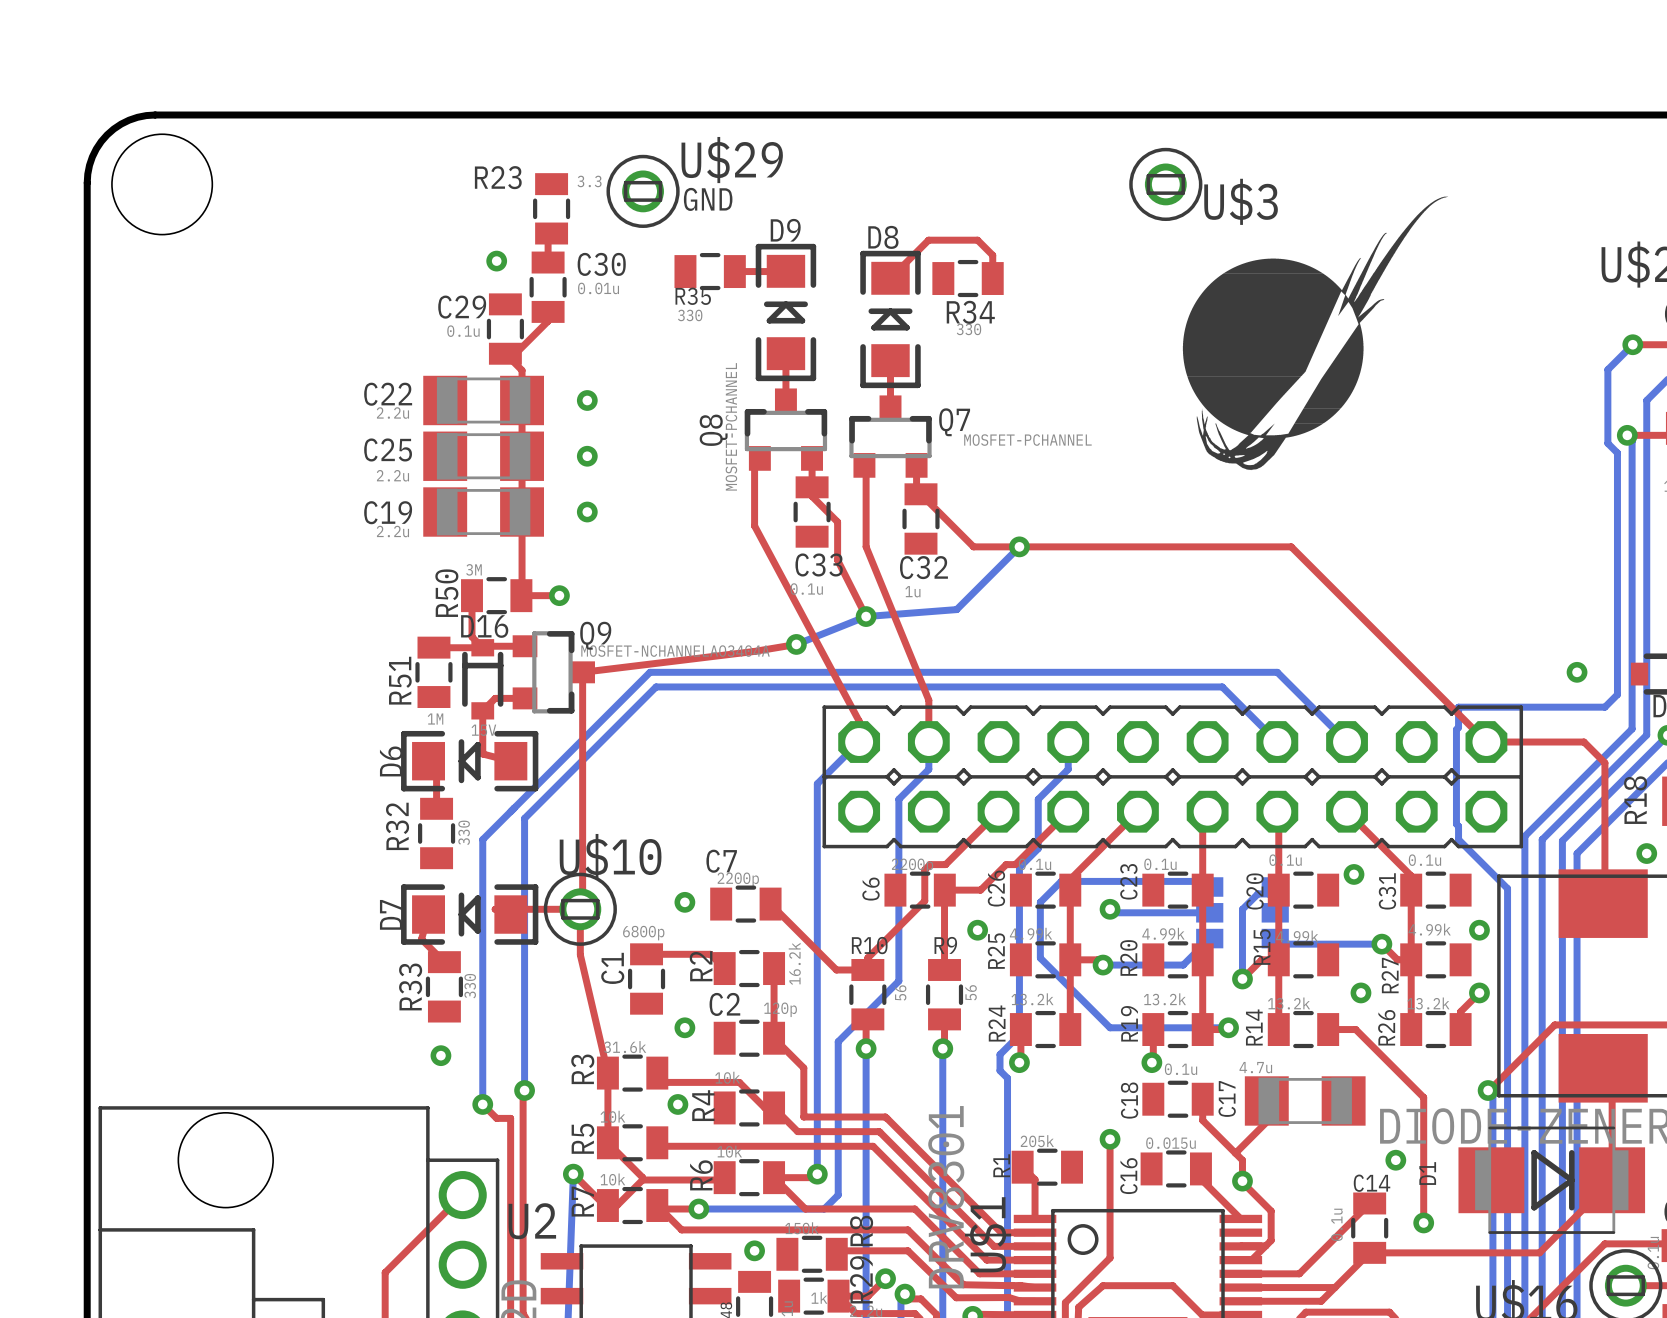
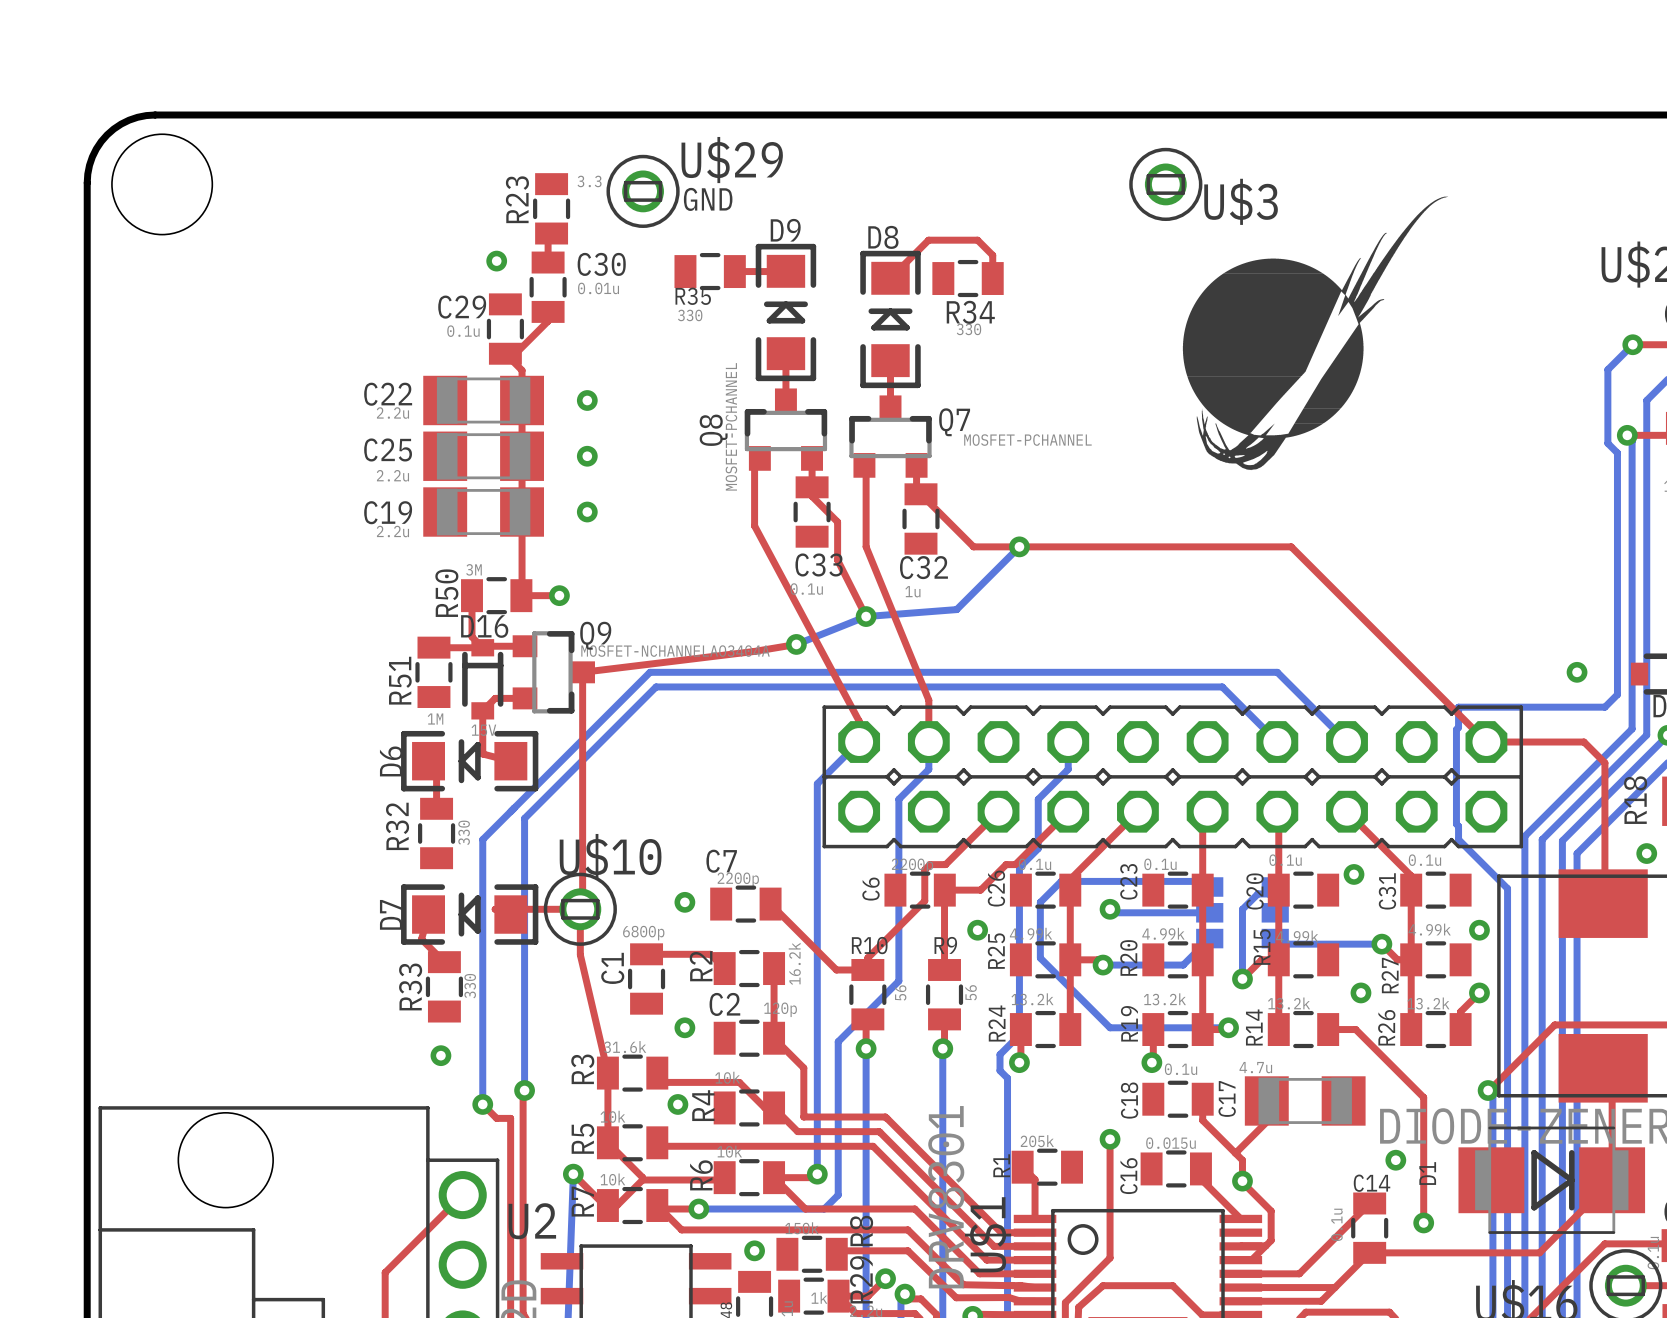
R23 name rotation: 0° (498, 177) -> 90° counterclockwise (517, 199)

